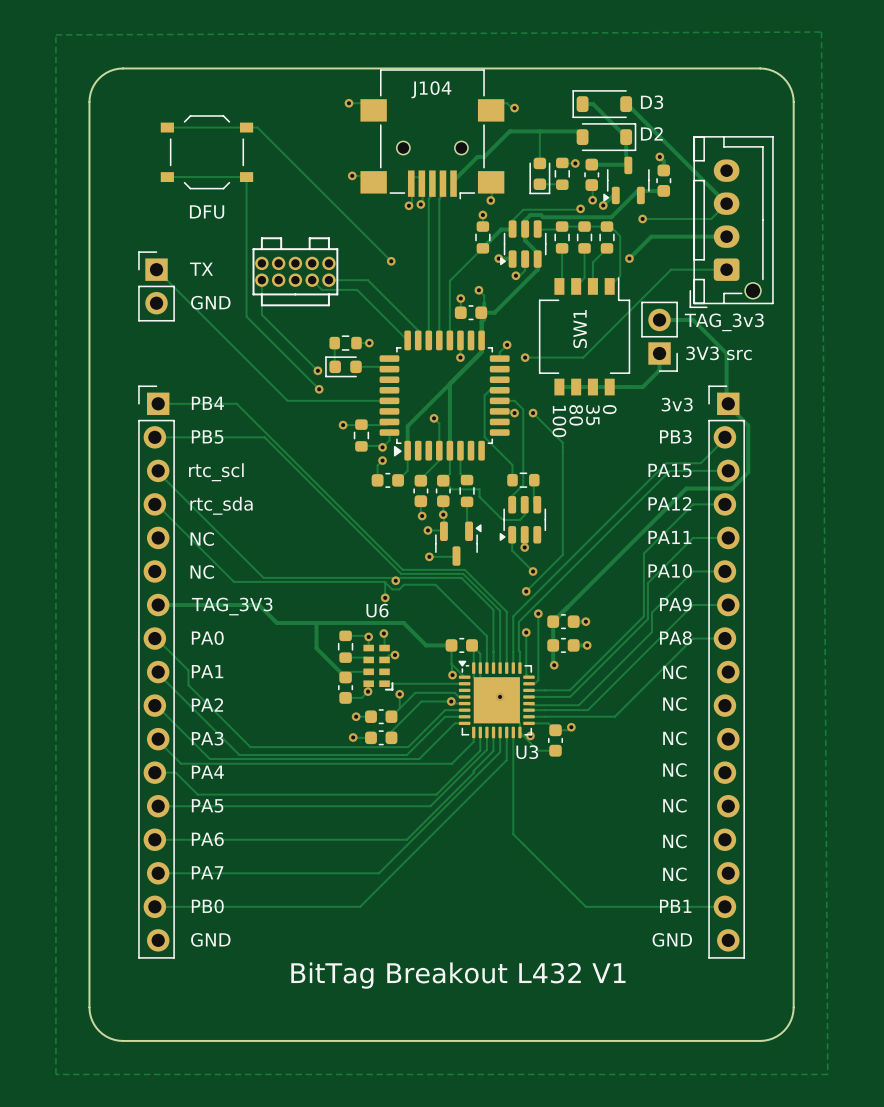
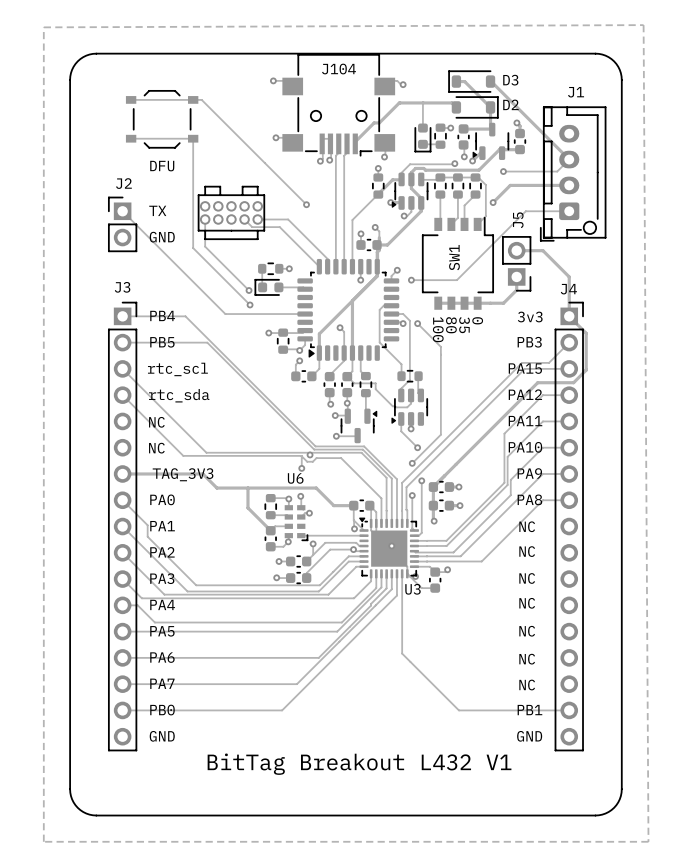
J1 name: none -> J1 (576, 92)
J2 name: none -> J2 (123, 183)
J5 name: none -> J5 (518, 220)
text: TAG_3v3 (724, 322) -> none
text: 3V3 src (719, 353) -> none
part: (156, 672) -> none
J3: none -> (122, 526)
part: (726, 672) -> none
J4: none -> (569, 526)

